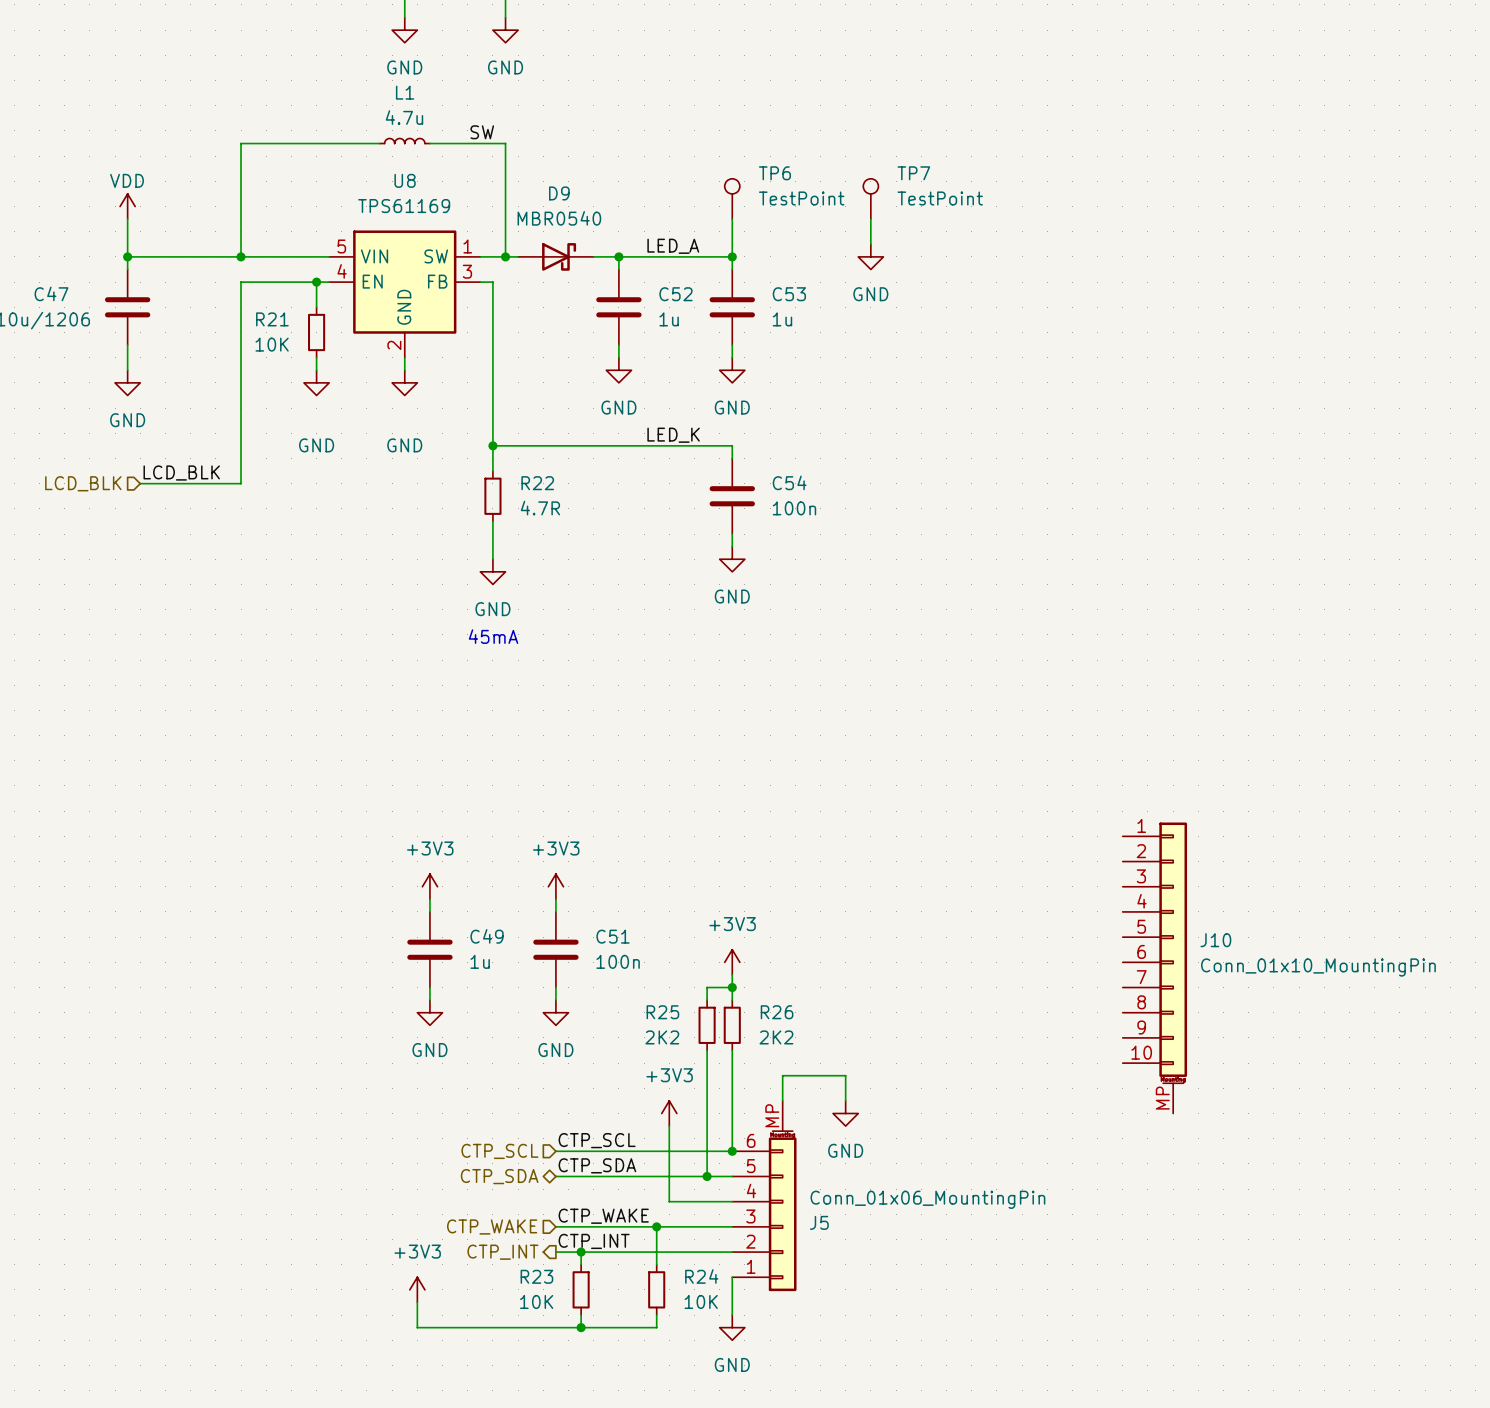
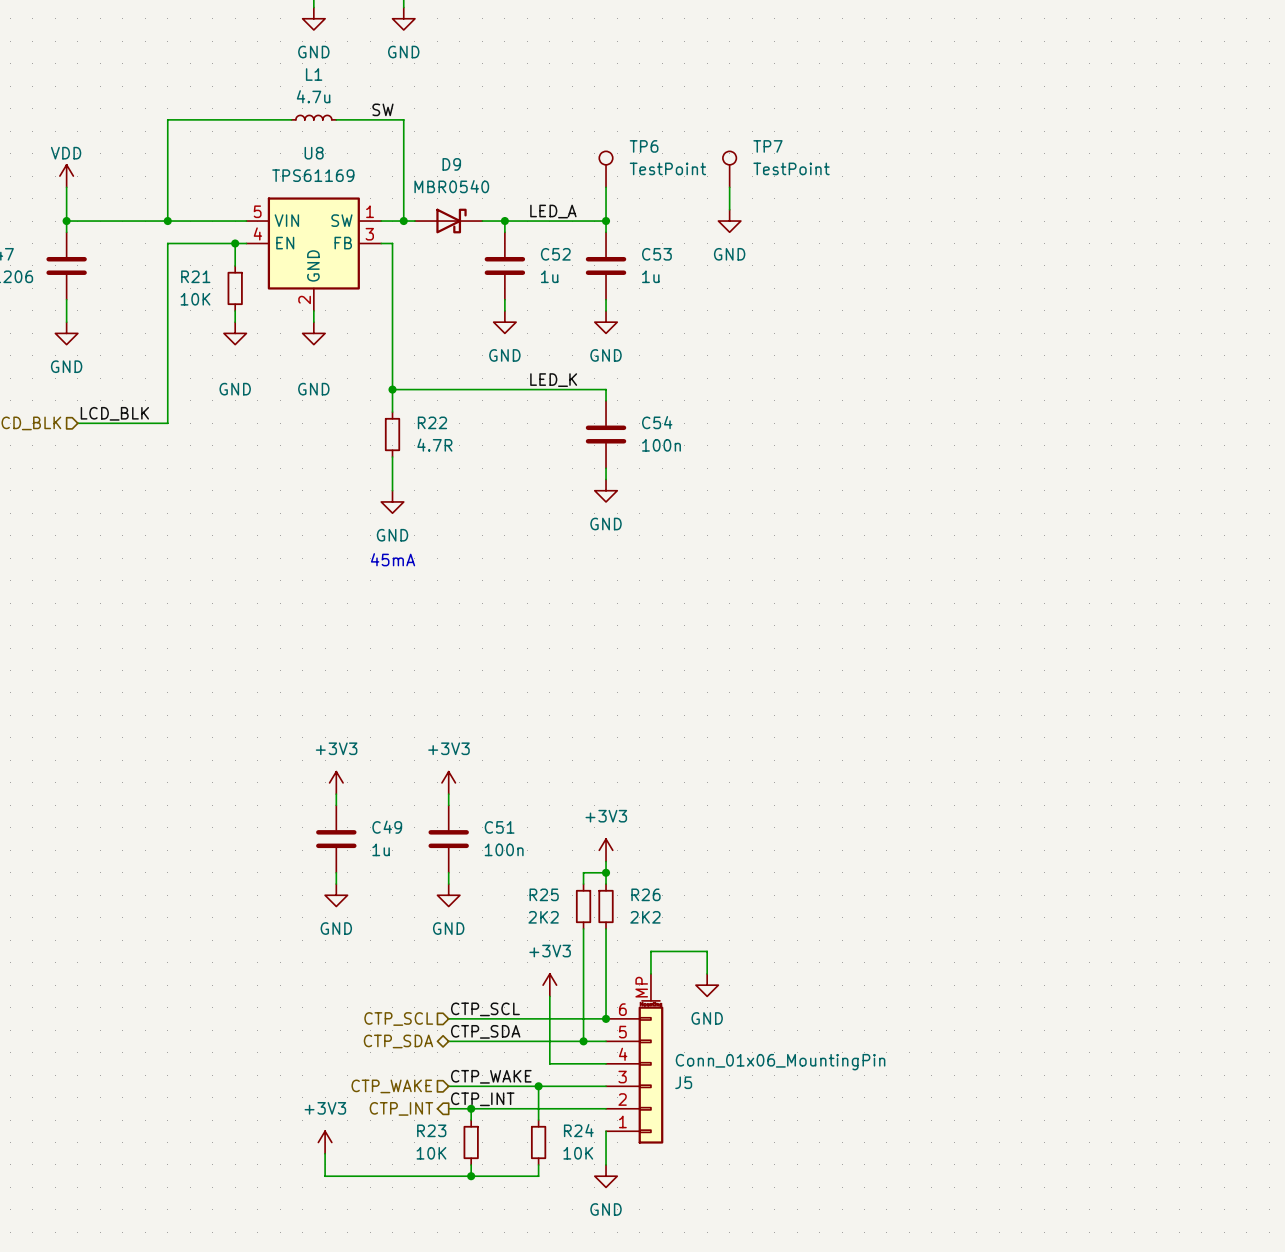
J10: Conn_01x10_MountingPin (1154, 968) -> none

